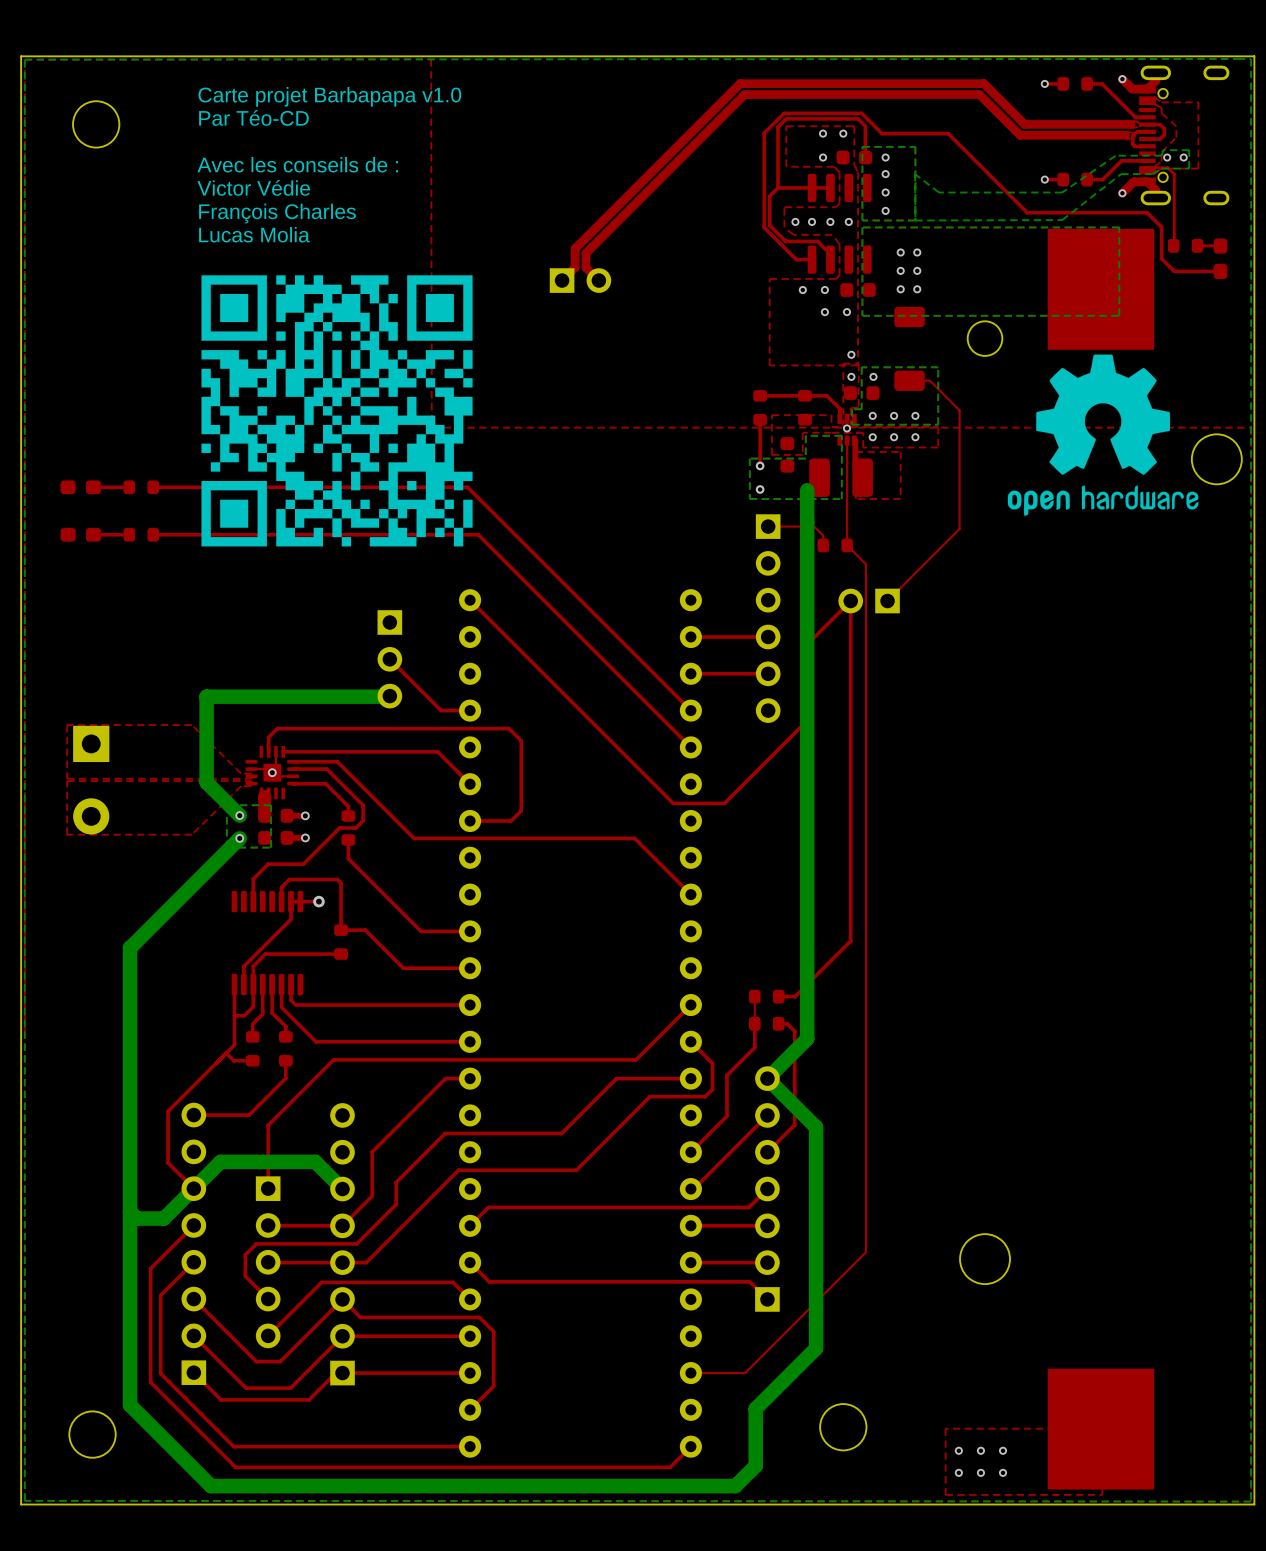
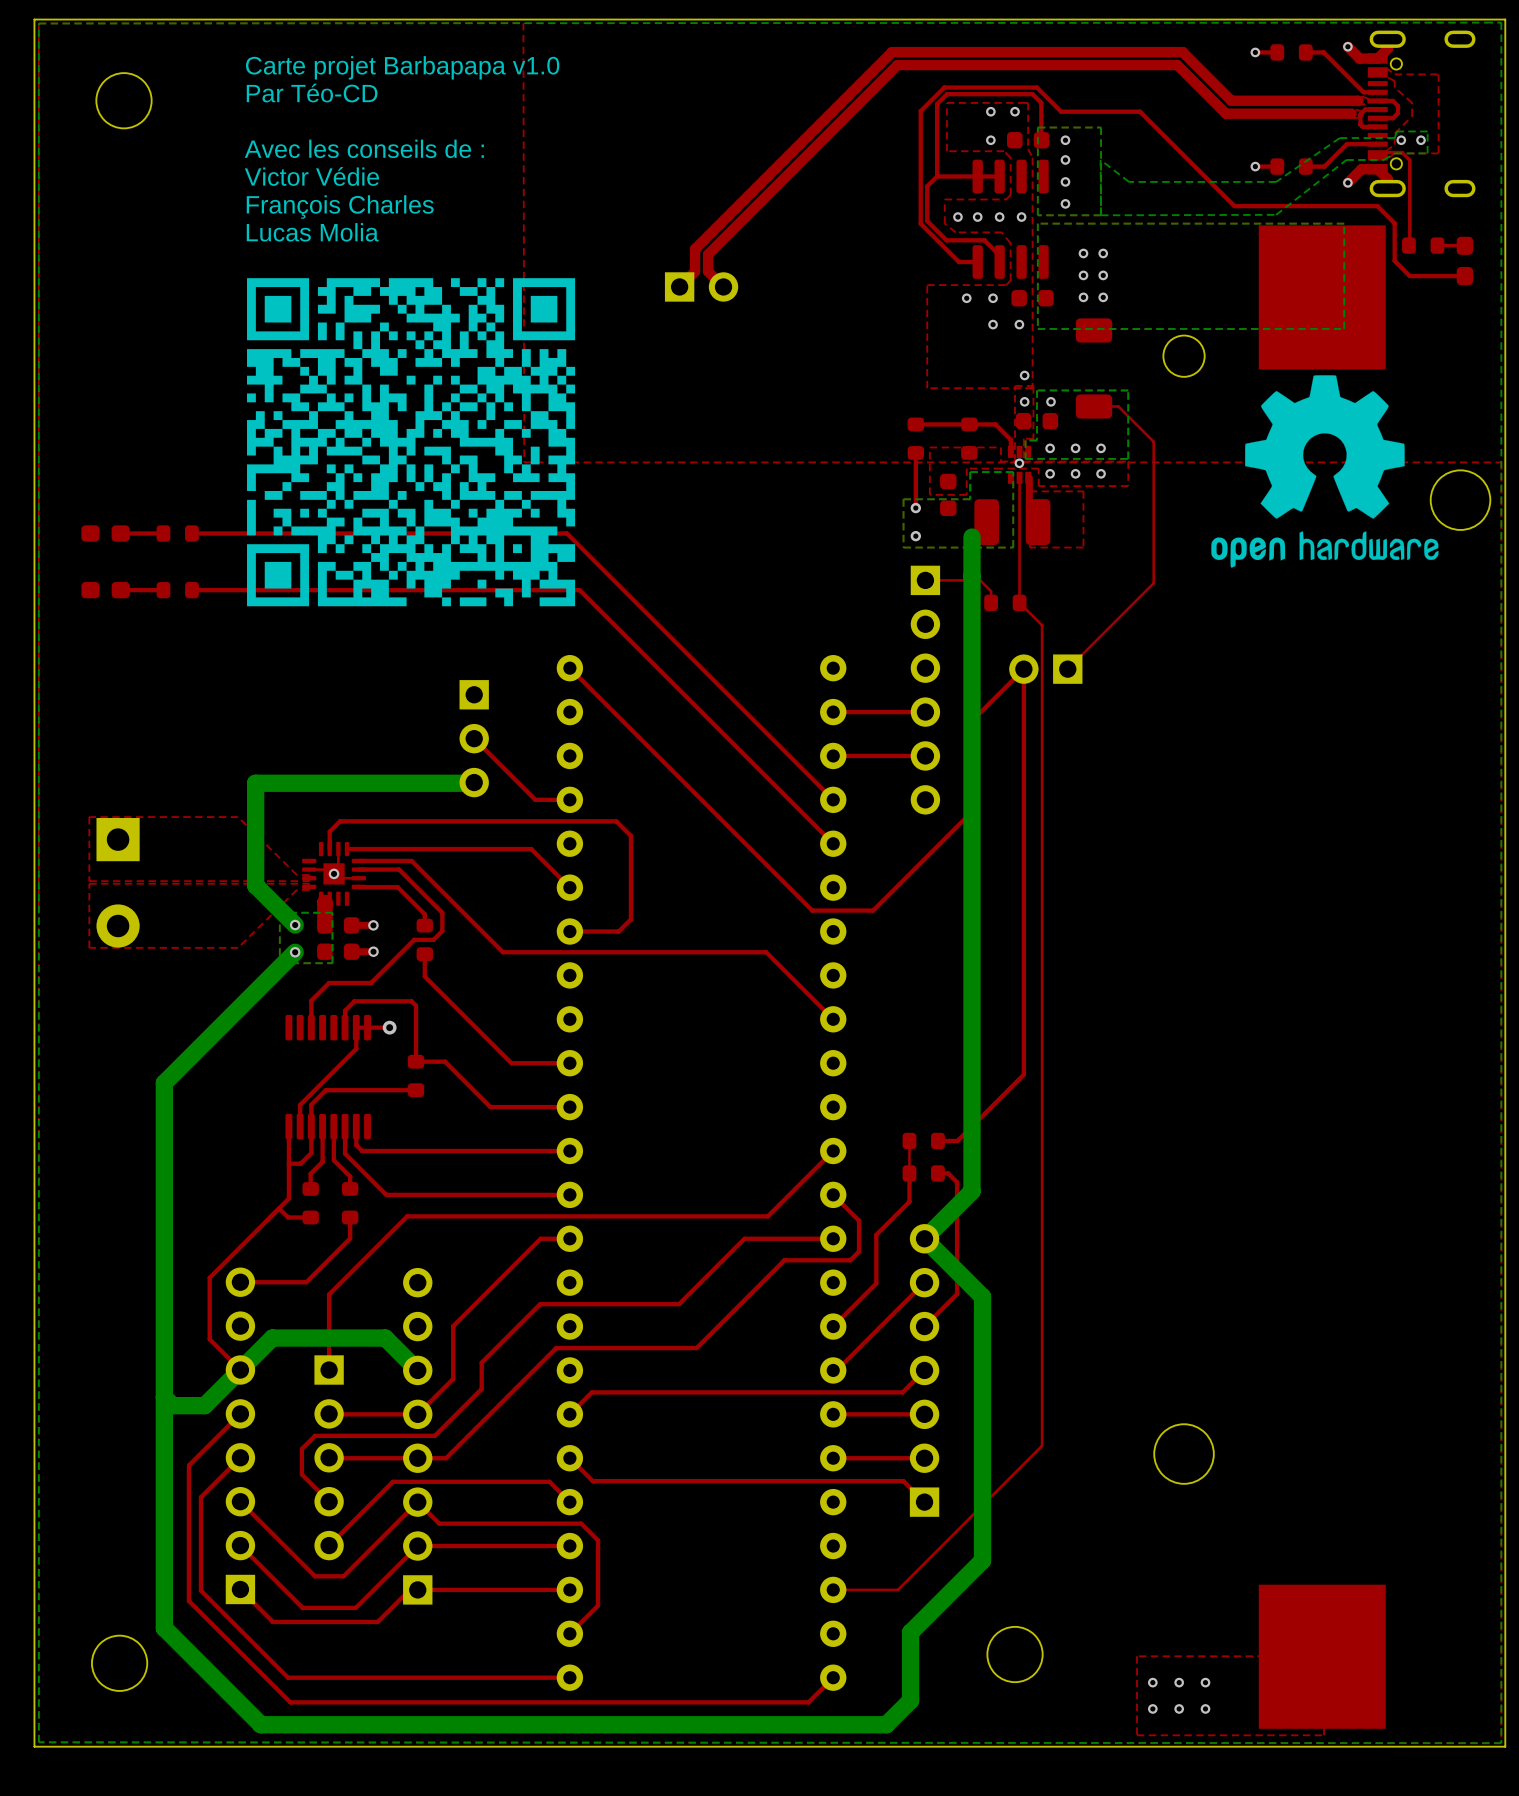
drawing shape: [201, 275, 473, 547] -> [247, 278, 576, 607]

